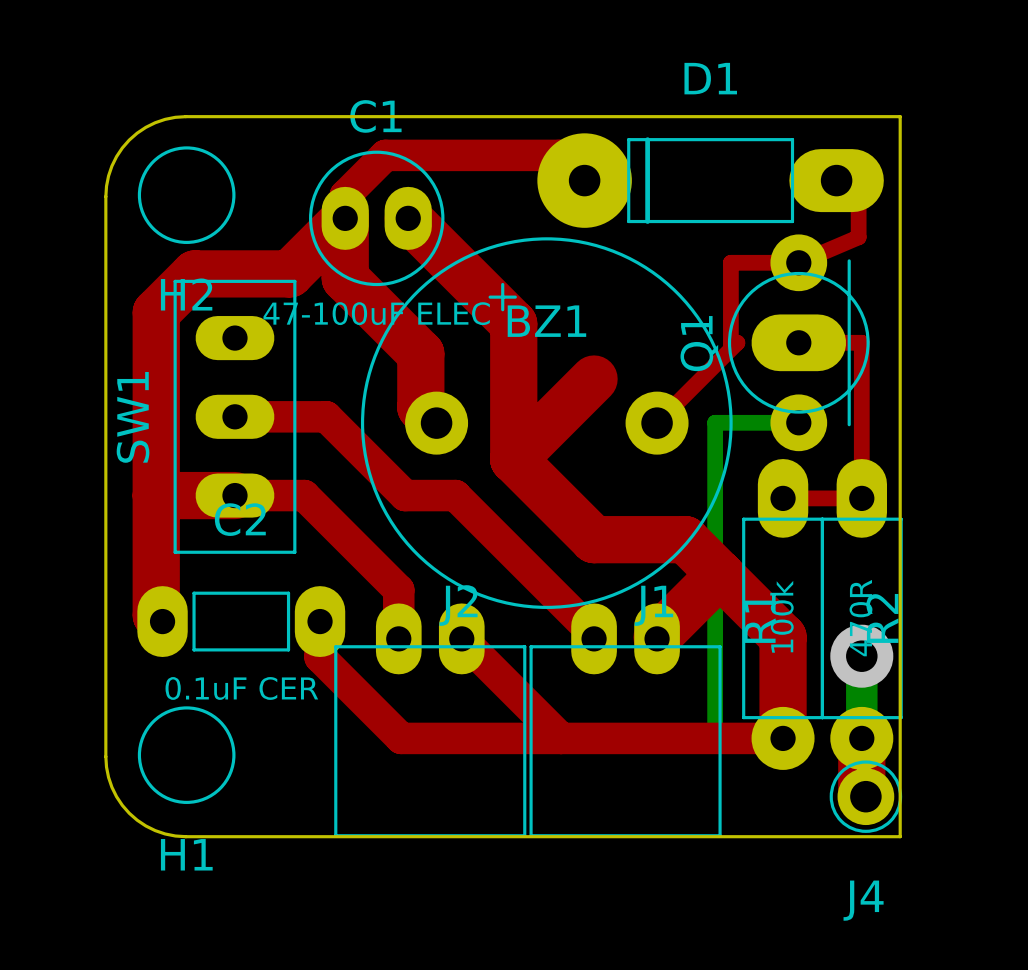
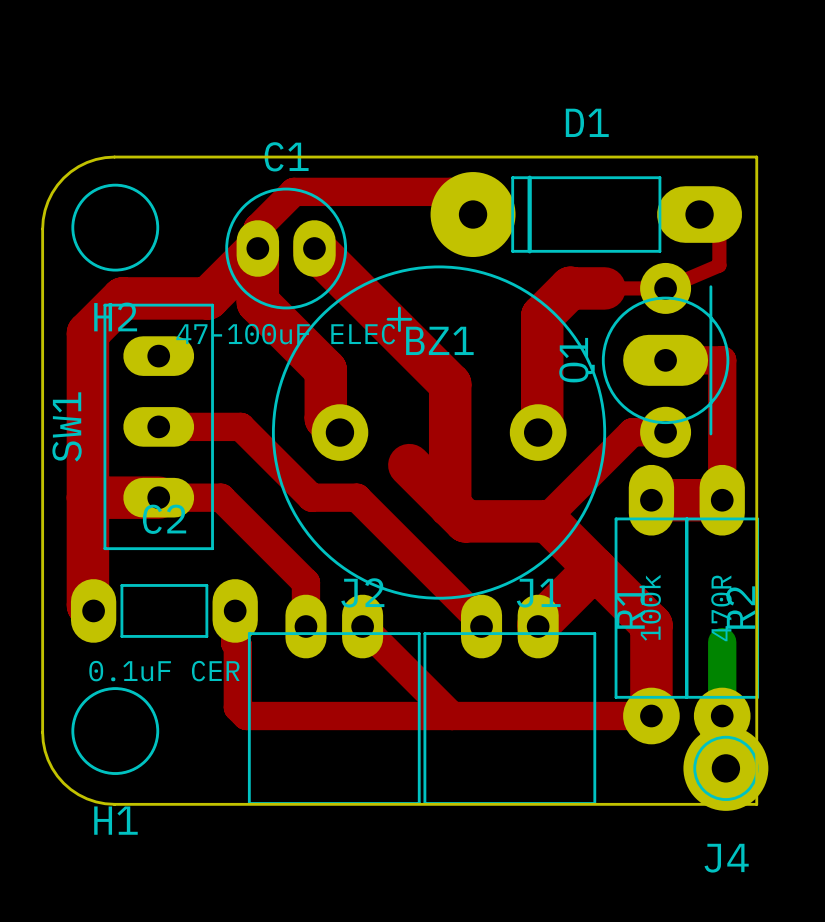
top track: (730, 262) (730, 342) (737, 342) (661, 418) -> (604, 288) (570, 287) (542, 316) (542, 428)
top track: (513, 323) (513, 459) (594, 379) -> (409, 343) (450, 384) (450, 506)
top track width: thin (798, 342) (861, 342) (861, 498) (783, 498) -> thick (665, 360) (722, 360) (722, 500) (651, 500)
top track: none -> (665, 432) (632, 432) (547, 516) (547, 521)
bottom track: (798, 422) (715, 422) (715, 738) (783, 738) -> none
top track: (576, 521) (594, 539) (685, 539) -> (465, 521) (547, 521)
via: (861, 656) -> none
top track: (322, 660) (401, 738) -> (237, 645) (237, 707) (246, 716) (308, 716)
J4 footprint: [829, 760, 903, 833] -> [683, 725, 769, 811]

